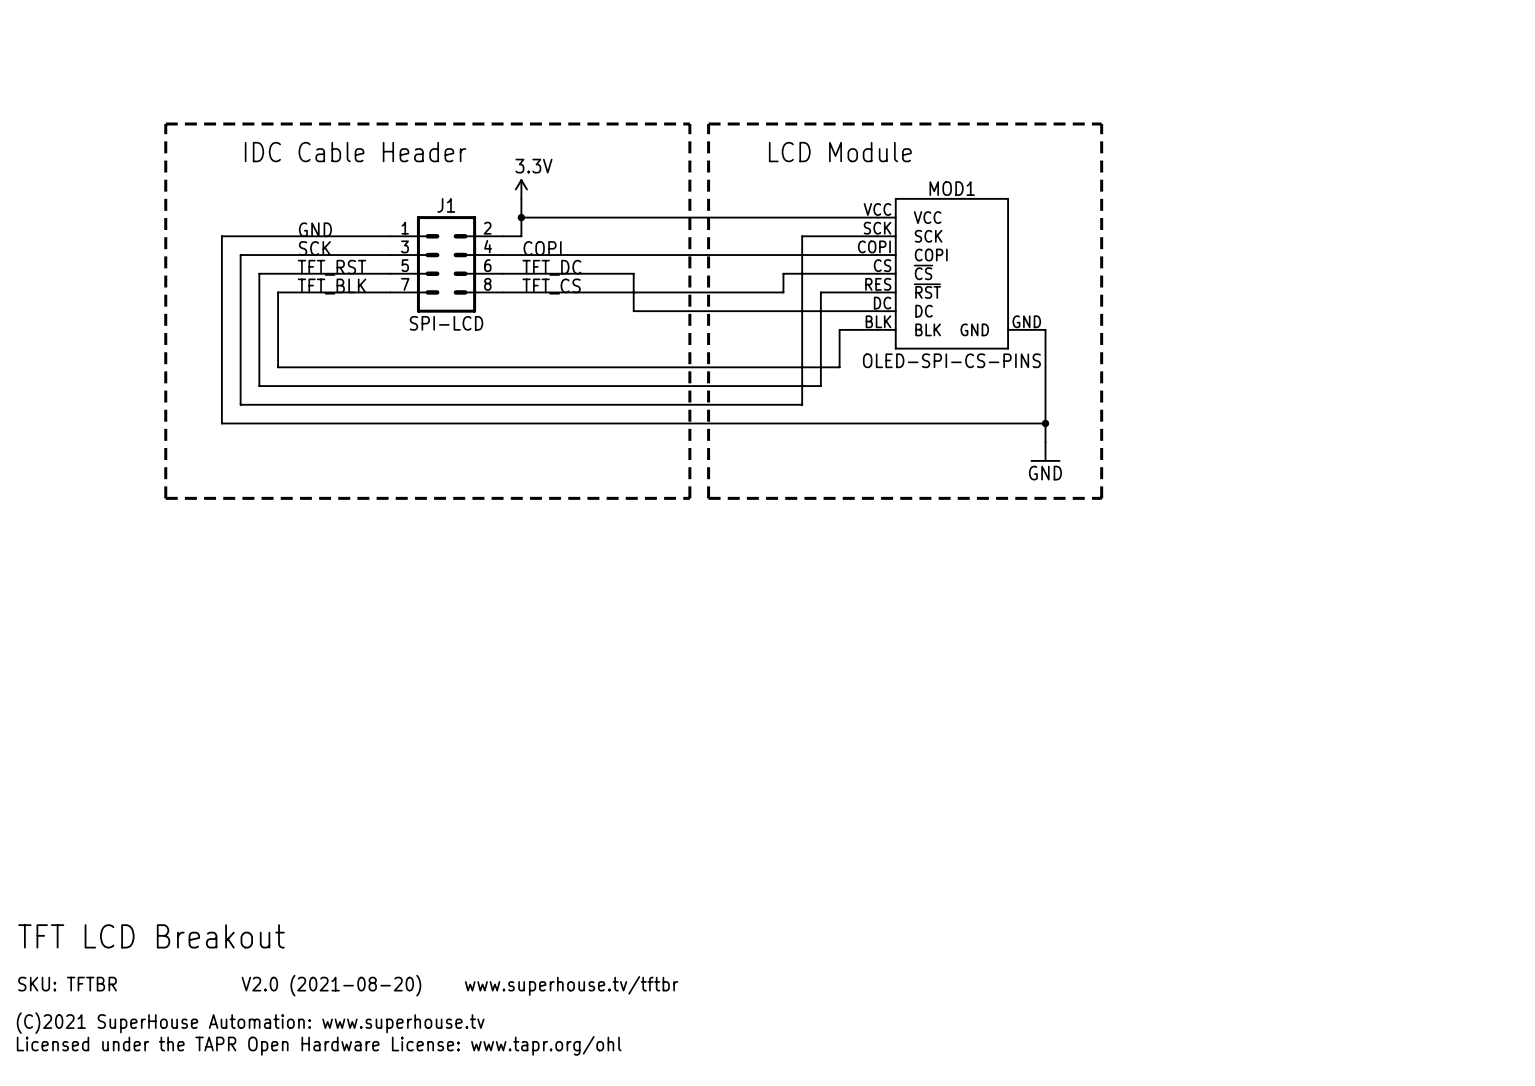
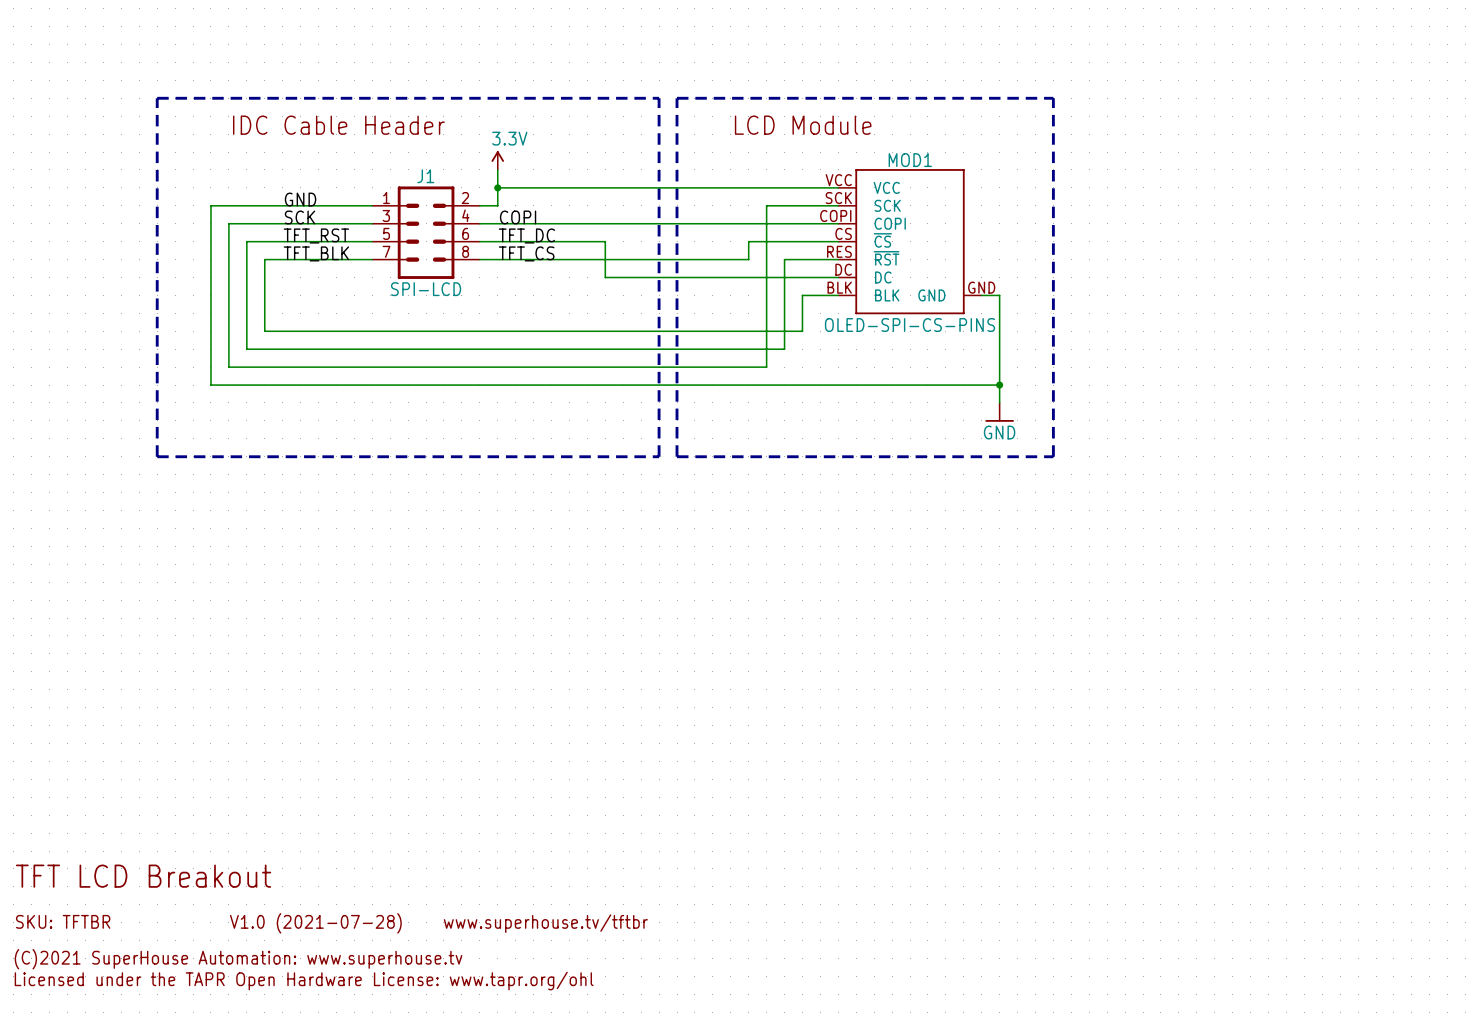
text: V2.0 (2021-08-20) (331, 985) -> V1.0 (2021-07-28) (315, 923)

